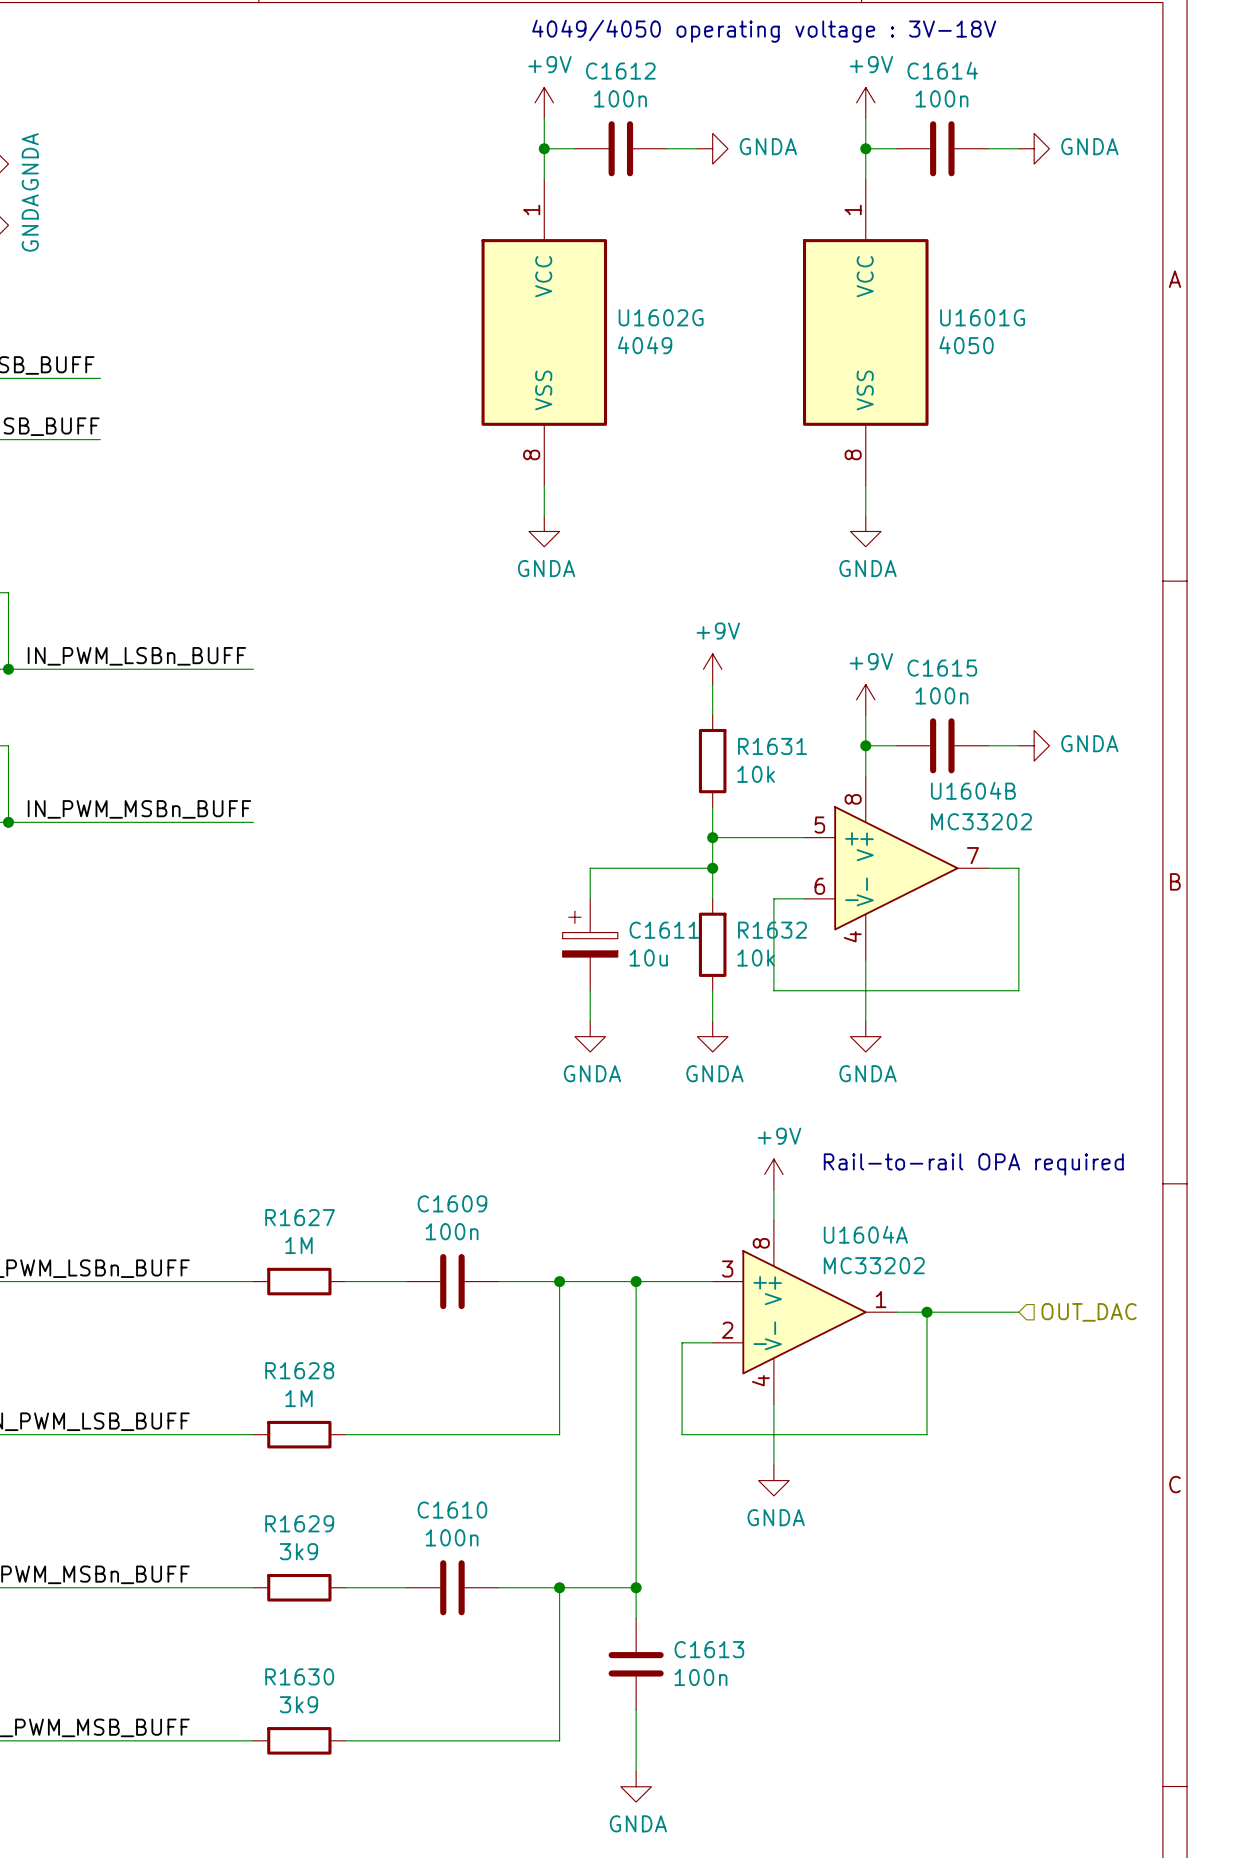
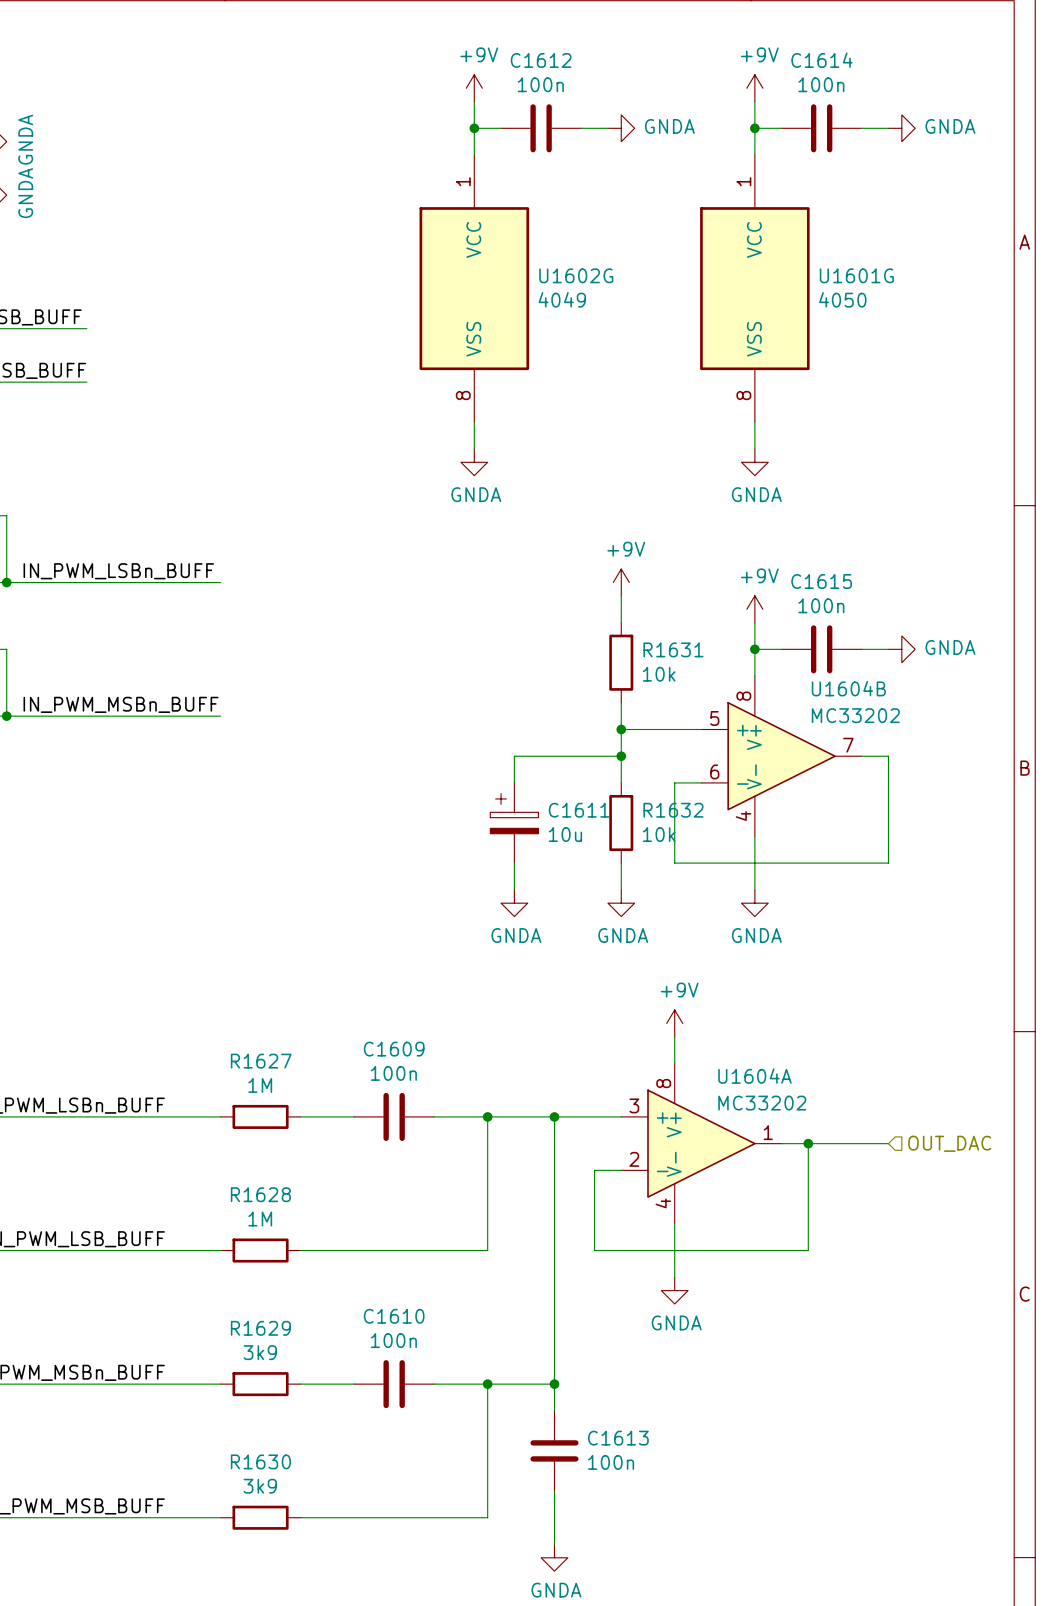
text: 4049/4050 operating voltage : 3V-18V (764, 31) -> none
text: Rail-to-rail OPA required (973, 1164) -> none

